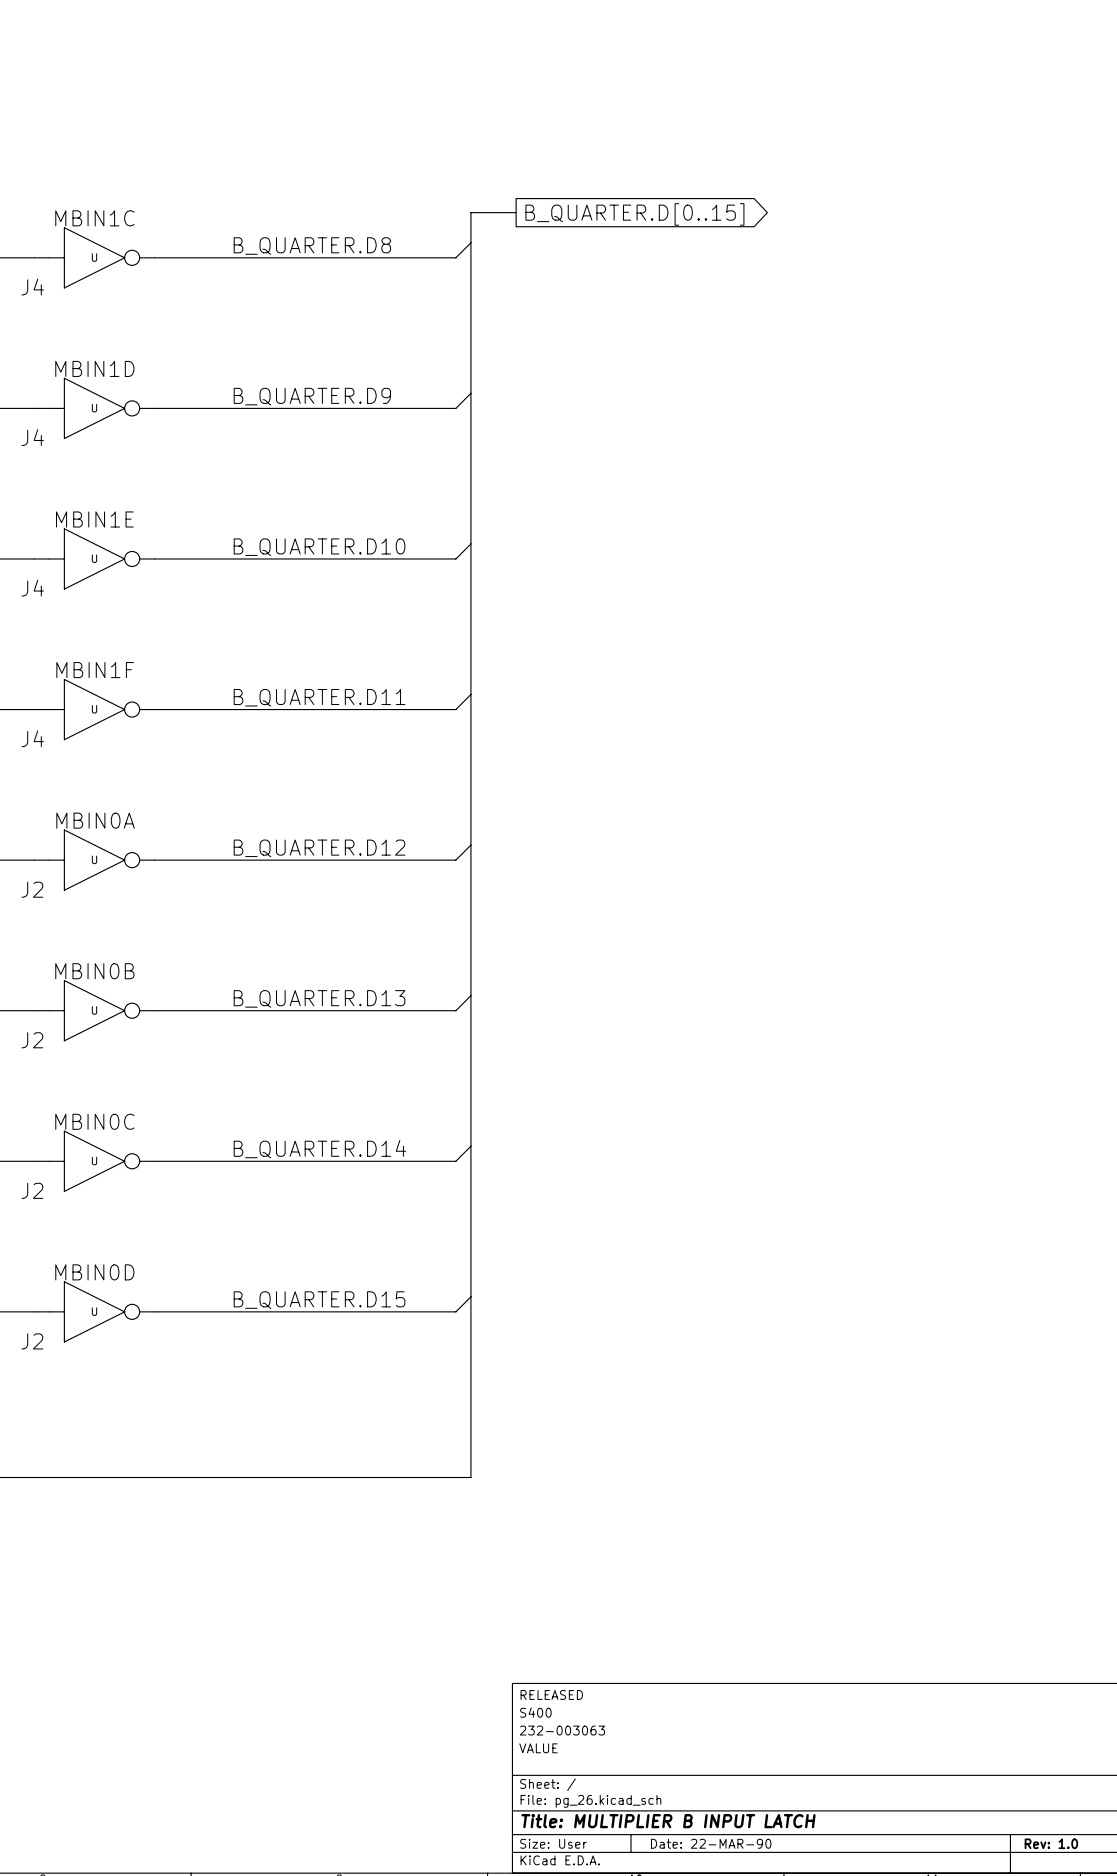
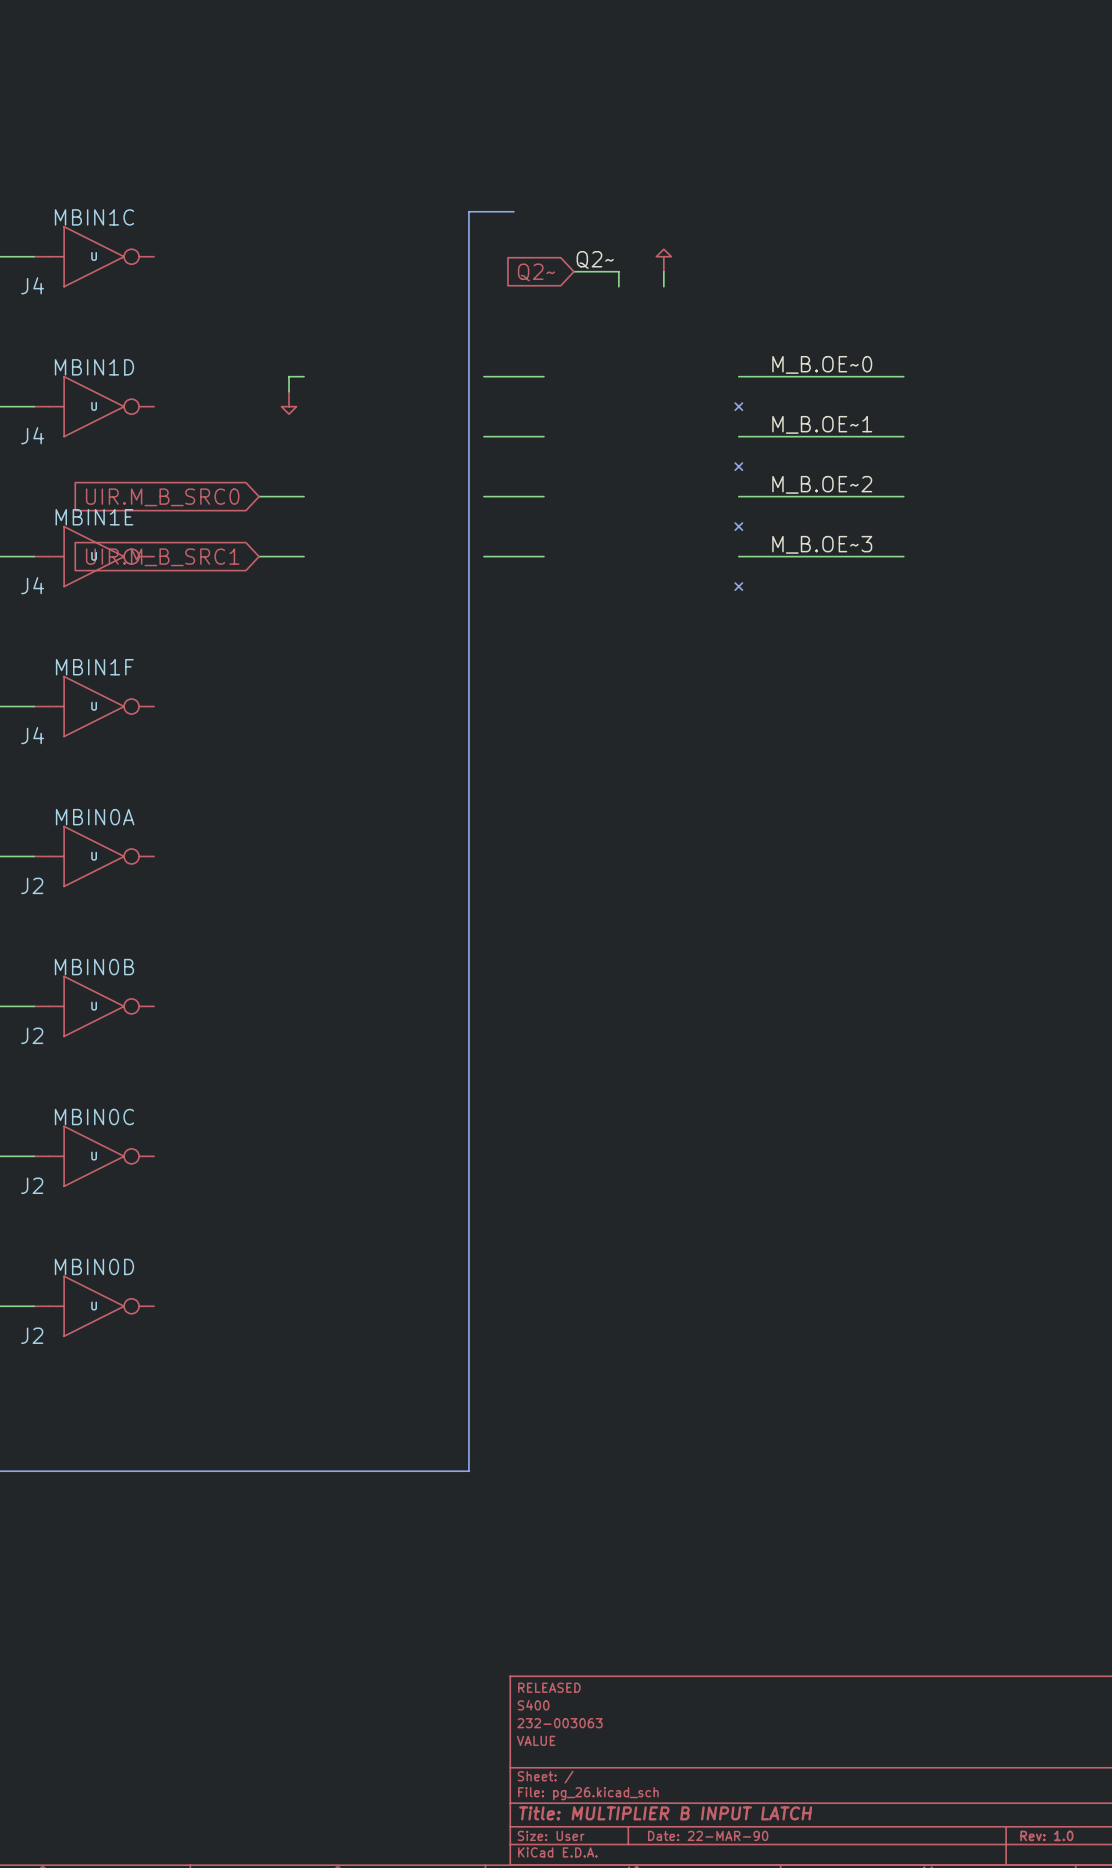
global label: B_QUARTER.D[0..15] (634, 214) -> none
wire: (470, 242) (455, 257) (154, 257) -> none
label: B_QUARTER.D8 (312, 246) -> none
label: none -> Q2~ (595, 259)
power symbol: none -> (663, 260)
wire: none -> (573, 271) (618, 271) (618, 286)
wire: none -> (663, 271) (663, 286)
global label: none -> Q2~ (536, 272)
label: none -> M_B.OE~0 (822, 364)
wire: none -> (304, 376) (289, 376) (289, 391)
wire: none -> (483, 376) (543, 376)
wire: none -> (738, 376) (903, 376)
wire: (470, 393) (455, 408) (154, 408) -> none
label: B_QUARTER.D9 (312, 396) -> none
power symbol: none -> (289, 403)
no-connect mark: none -> (738, 406)
label: none -> M_B.OE~1 (822, 424)
wire: none -> (483, 436) (543, 436)
wire: none -> (738, 436) (903, 436)
no-connect mark: none -> (738, 466)
label: none -> M_B.OE~2 (822, 484)
wire: none -> (259, 496) (304, 496)
wire: none -> (483, 496) (543, 496)
wire: none -> (738, 496) (903, 496)
global label: none -> UIR.M_B_SRC0 (162, 497)
no-connect mark: none -> (738, 526)
wire: (470, 543) (455, 558) (305, 558) -> none
label: B_QUARTER.D10 (319, 547) -> none
label: none -> M_B.OE~3 (822, 544)
wire: (154, 558) (260, 558) -> none
wire: none -> (483, 556) (543, 556)
wire: none -> (738, 556) (903, 556)
global label: none -> UIR.M_B_SRC1 (162, 557)
no-connect mark: none -> (738, 586)
wire: (470, 694) (455, 709) (154, 709) -> none
label: B_QUARTER.D11 (319, 697) -> none
wire: (470, 845) (455, 860) (154, 860) -> none
label: B_QUARTER.D12 (319, 848) -> none
wire: (470, 995) (455, 1010) (154, 1010) -> none
label: B_QUARTER.D13 (319, 998) -> none
wire: (470, 1146) (455, 1161) (154, 1161) -> none
label: B_QUARTER.D14 (319, 1149) -> none
wire: (470, 1296) (455, 1311) (154, 1311) -> none
label: B_QUARTER.D15 (319, 1300) -> none

